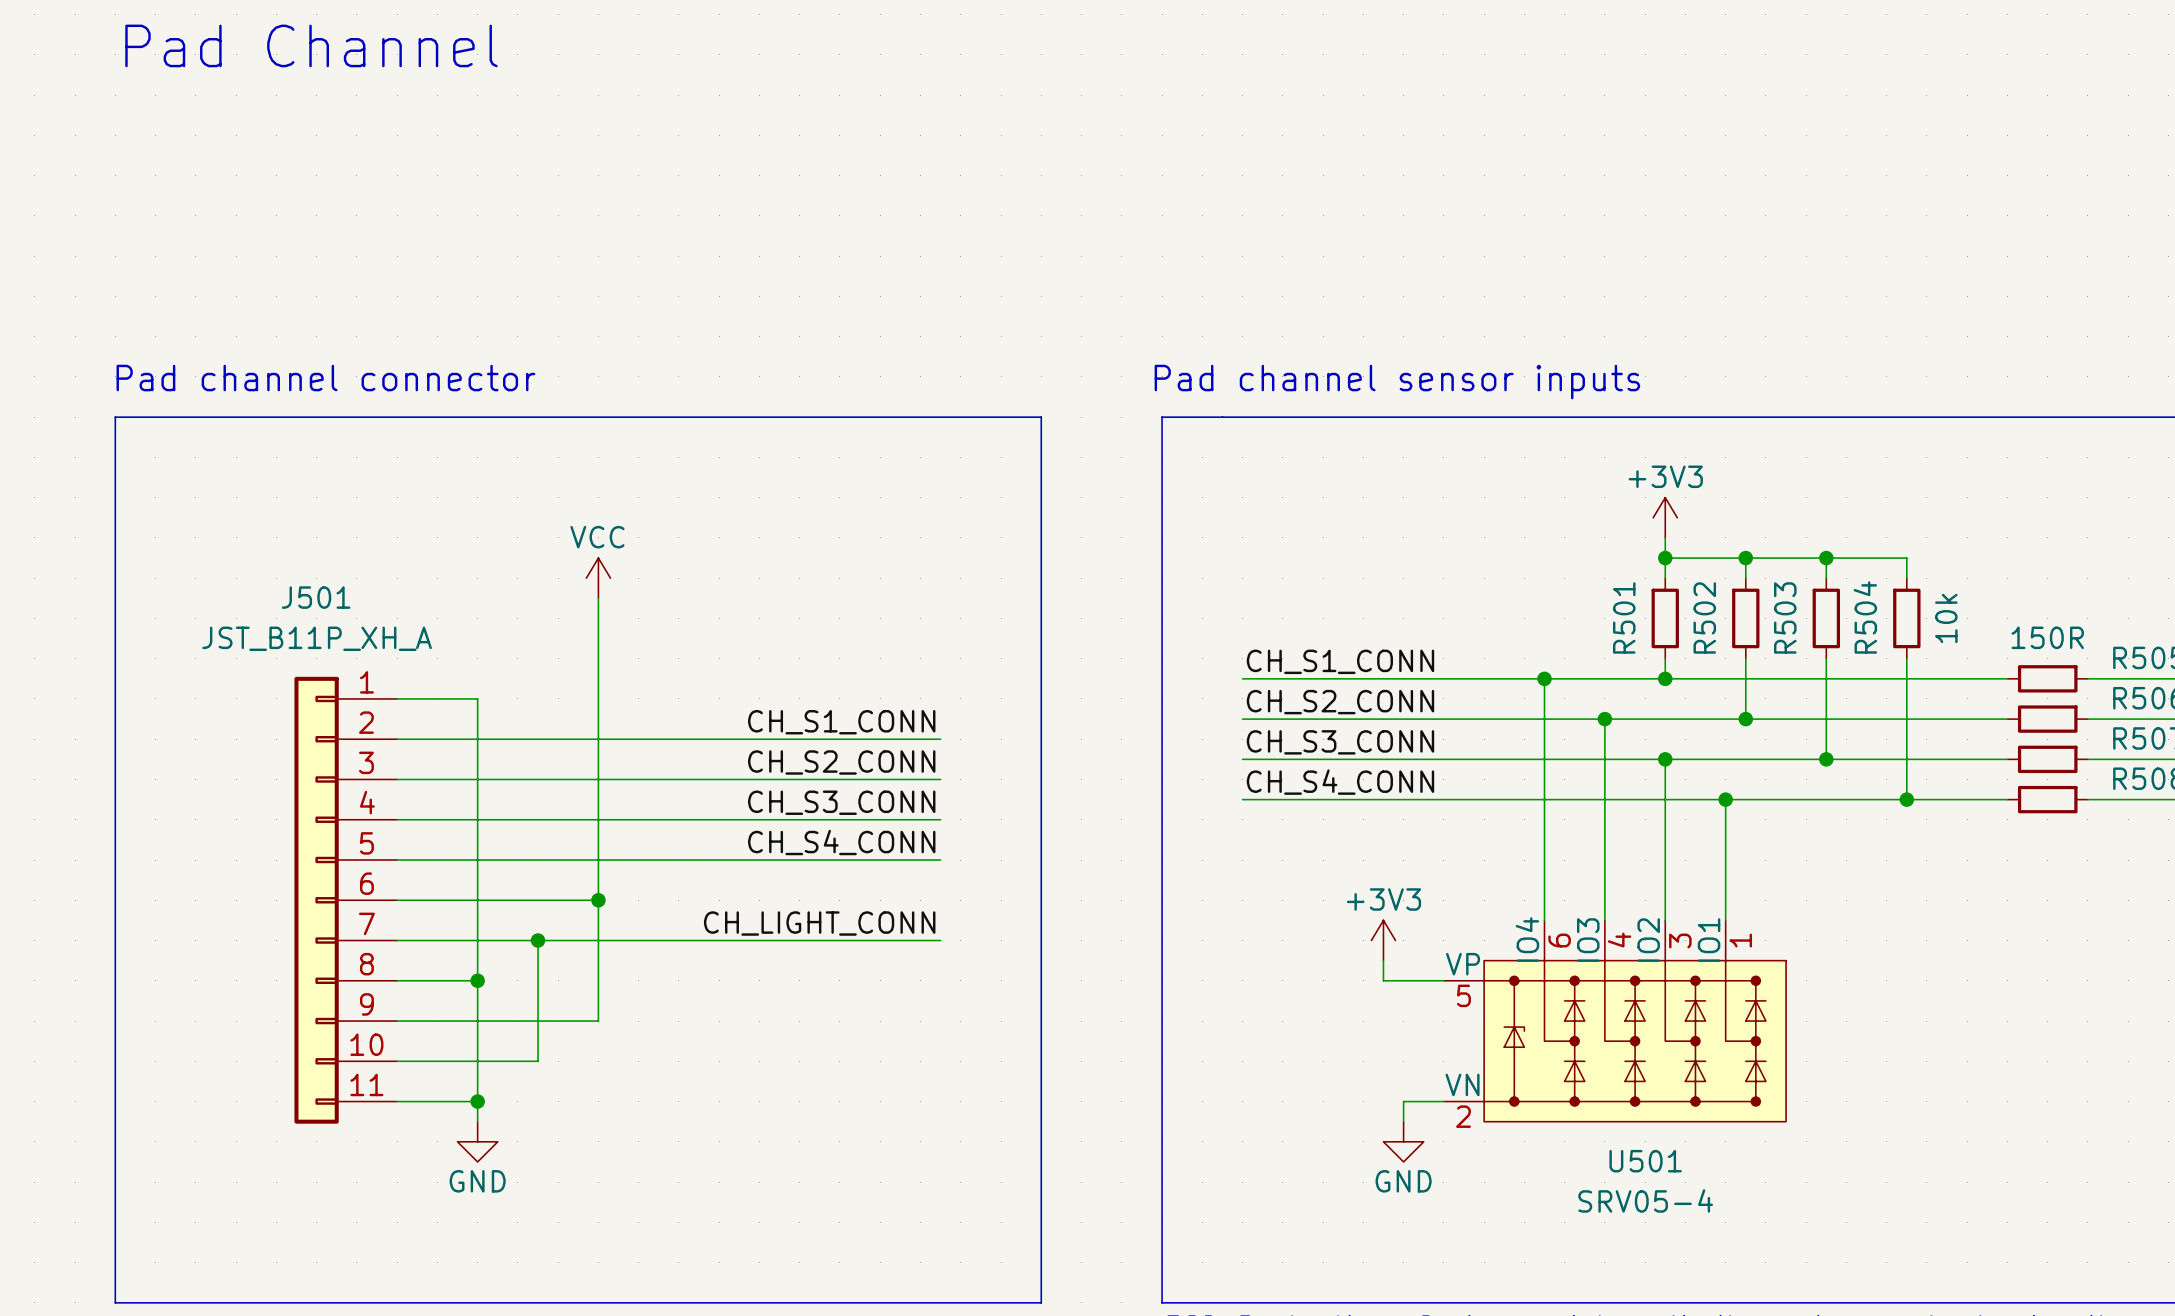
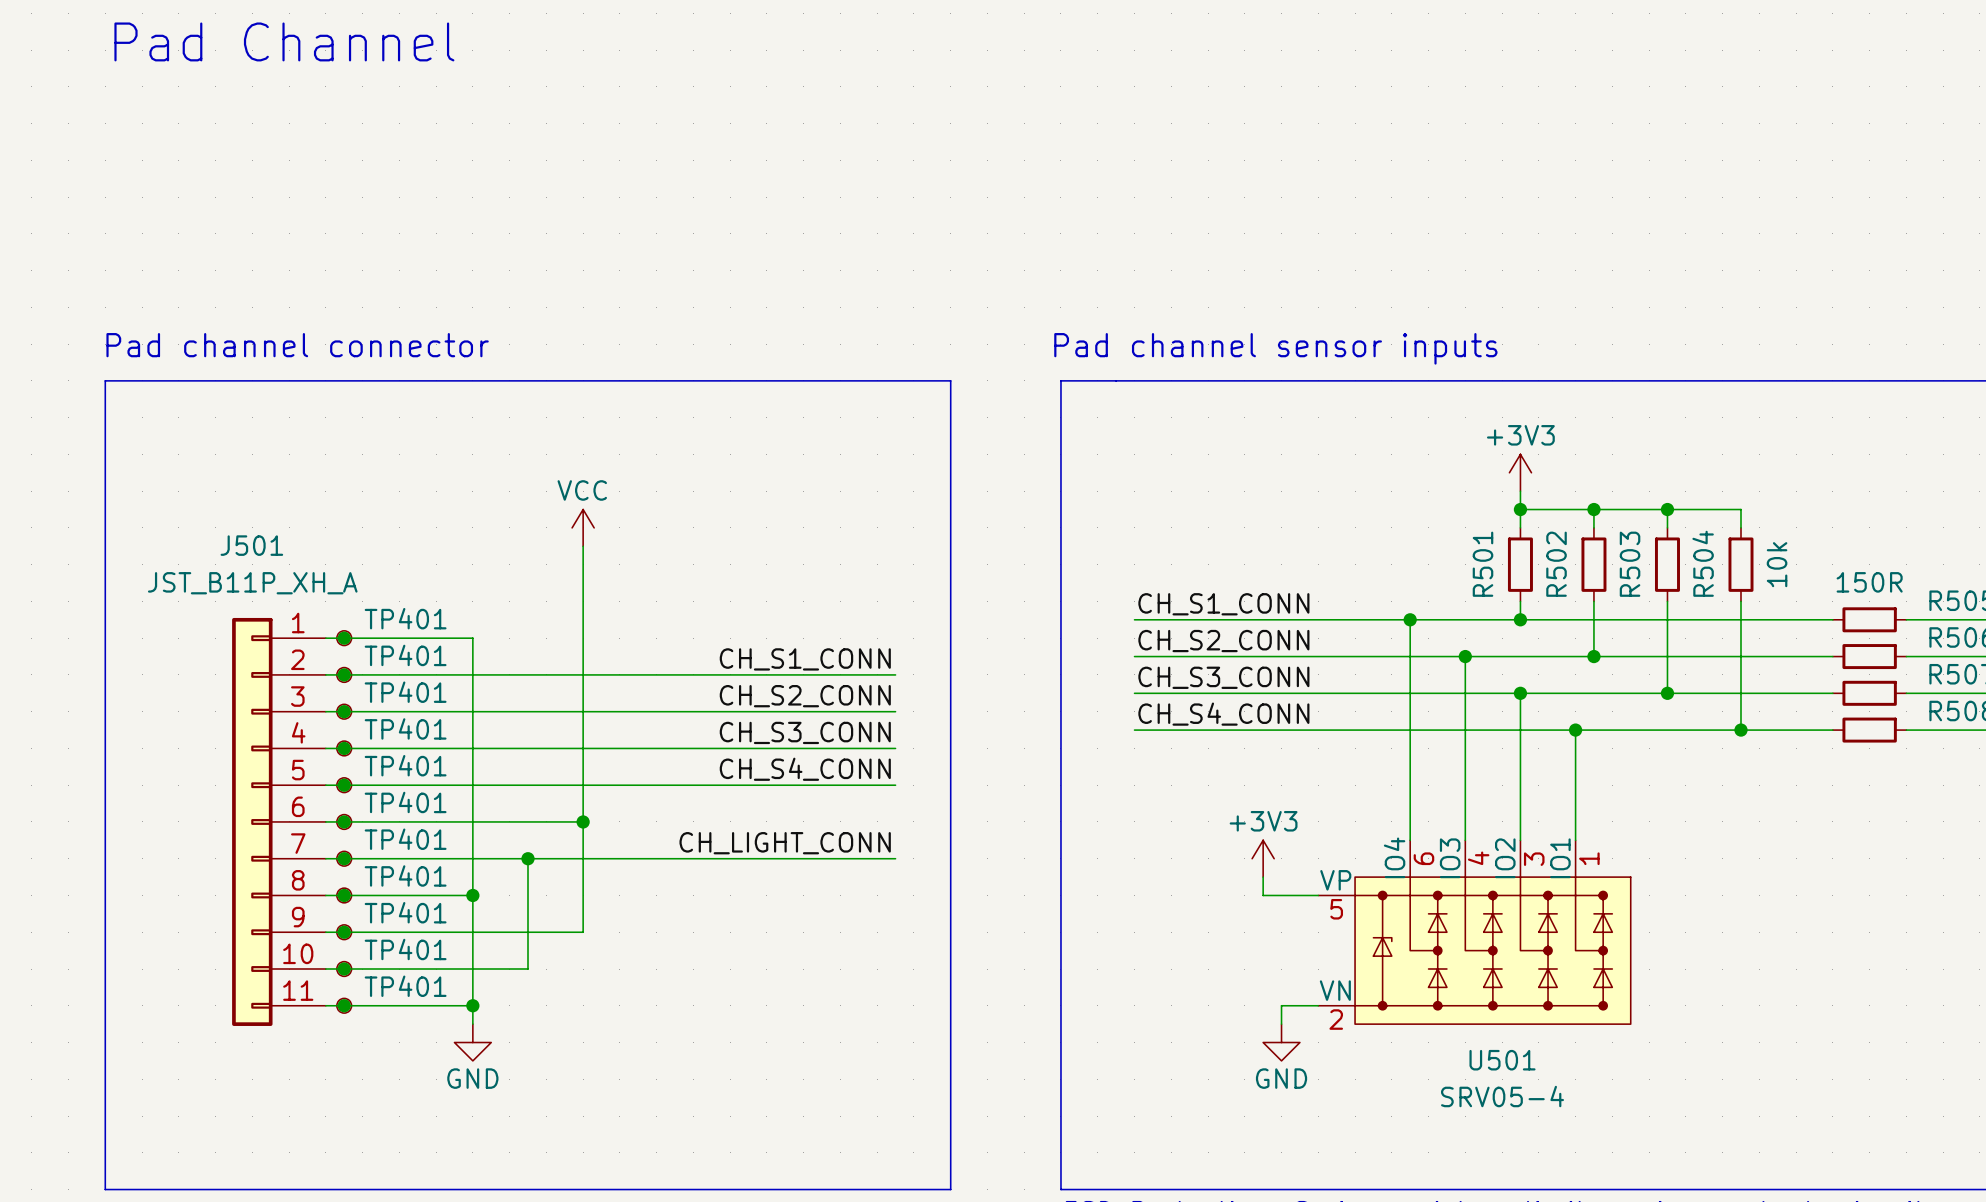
power symbol position: VCC (598, 578) -> VCC (583, 527)
wire: (598, 598) (598, 1021) -> (583, 546) (583, 932) (546, 932)
junction: none -> (344, 638)
TP401: none -> (344, 638)
wire: (477, 698) (477, 1121) -> (436, 638) (472, 638) (472, 1024)
label position: CH_S1_CONN (841, 722) -> CH_S1_CONN (805, 659)
junction: none -> (344, 674)
TP401: none -> (344, 674)
wire: none -> (858, 674) (895, 674)
label position: CH_S2_CONN (841, 762) -> CH_S2_CONN (805, 696)
junction: none -> (344, 711)
TP401: none -> (344, 711)
wire: none -> (858, 711) (895, 711)
label position: CH_S3_CONN (841, 802) -> CH_S3_CONN (805, 732)
junction: none -> (344, 748)
TP401: none -> (344, 748)
wire: none -> (858, 748) (895, 748)
label position: CH_S4_CONN (841, 842) -> CH_S4_CONN (805, 769)
junction: none -> (344, 785)
TP401: none -> (344, 785)
wire: none -> (858, 785) (895, 785)
J501 position: (345, 900) -> (278, 821)
junction: none -> (344, 821)
TP401: none -> (344, 821)
wire: none -> (546, 821) (583, 821)
junction: (598, 900) -> none
junction: none -> (583, 821)
label position: CH_LIGHT_CONN (819, 923) -> CH_LIGHT_CONN (785, 843)
junction: none -> (344, 858)
TP401: none -> (344, 858)
wire: (538, 940) (538, 1061) -> (527, 858) (527, 969) (491, 969)
junction: (538, 940) -> none
junction: none -> (527, 858)
wire: none -> (858, 858) (895, 858)
junction: none -> (344, 895)
TP401: none -> (344, 895)
wire: none -> (436, 895) (472, 895)
junction: (477, 980) -> none
junction: none -> (472, 895)
junction: none -> (344, 932)
TP401: none -> (344, 932)
junction: none -> (344, 969)
TP401: none -> (344, 969)
junction: none -> (344, 1005)
TP401: none -> (344, 1005)
wire: none -> (436, 1005) (472, 1005)
junction position: (477, 1101) -> (472, 1005)
power symbol position: GND (477, 1141) -> GND (472, 1042)

